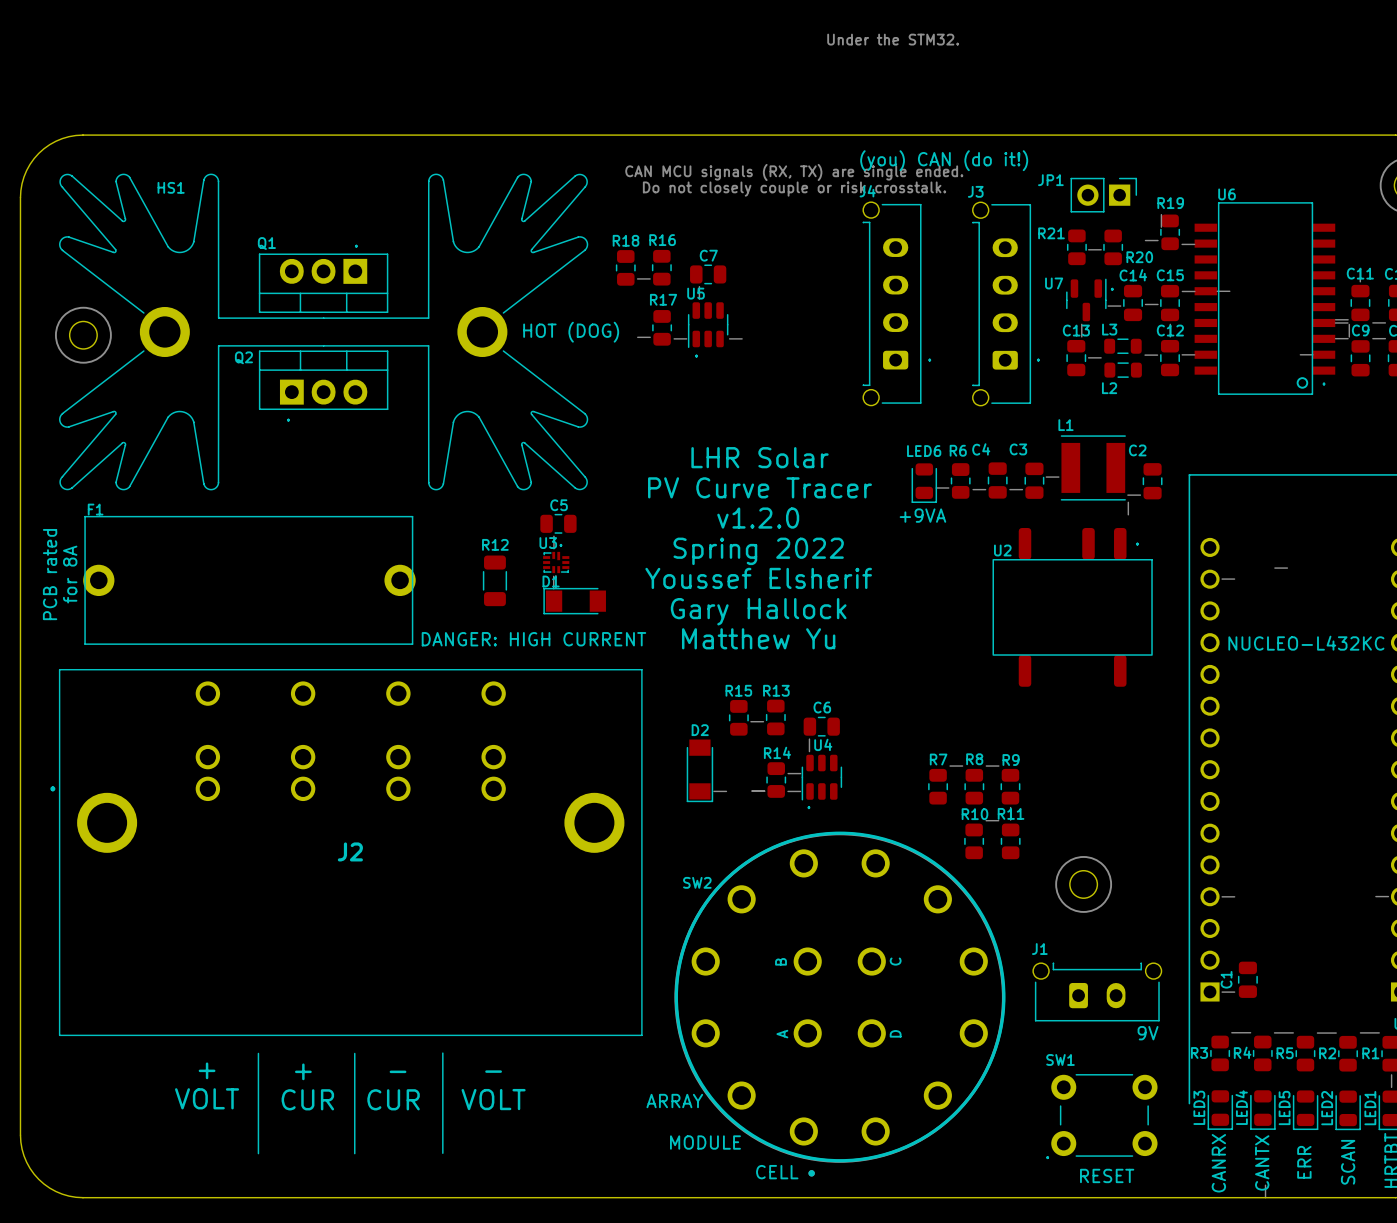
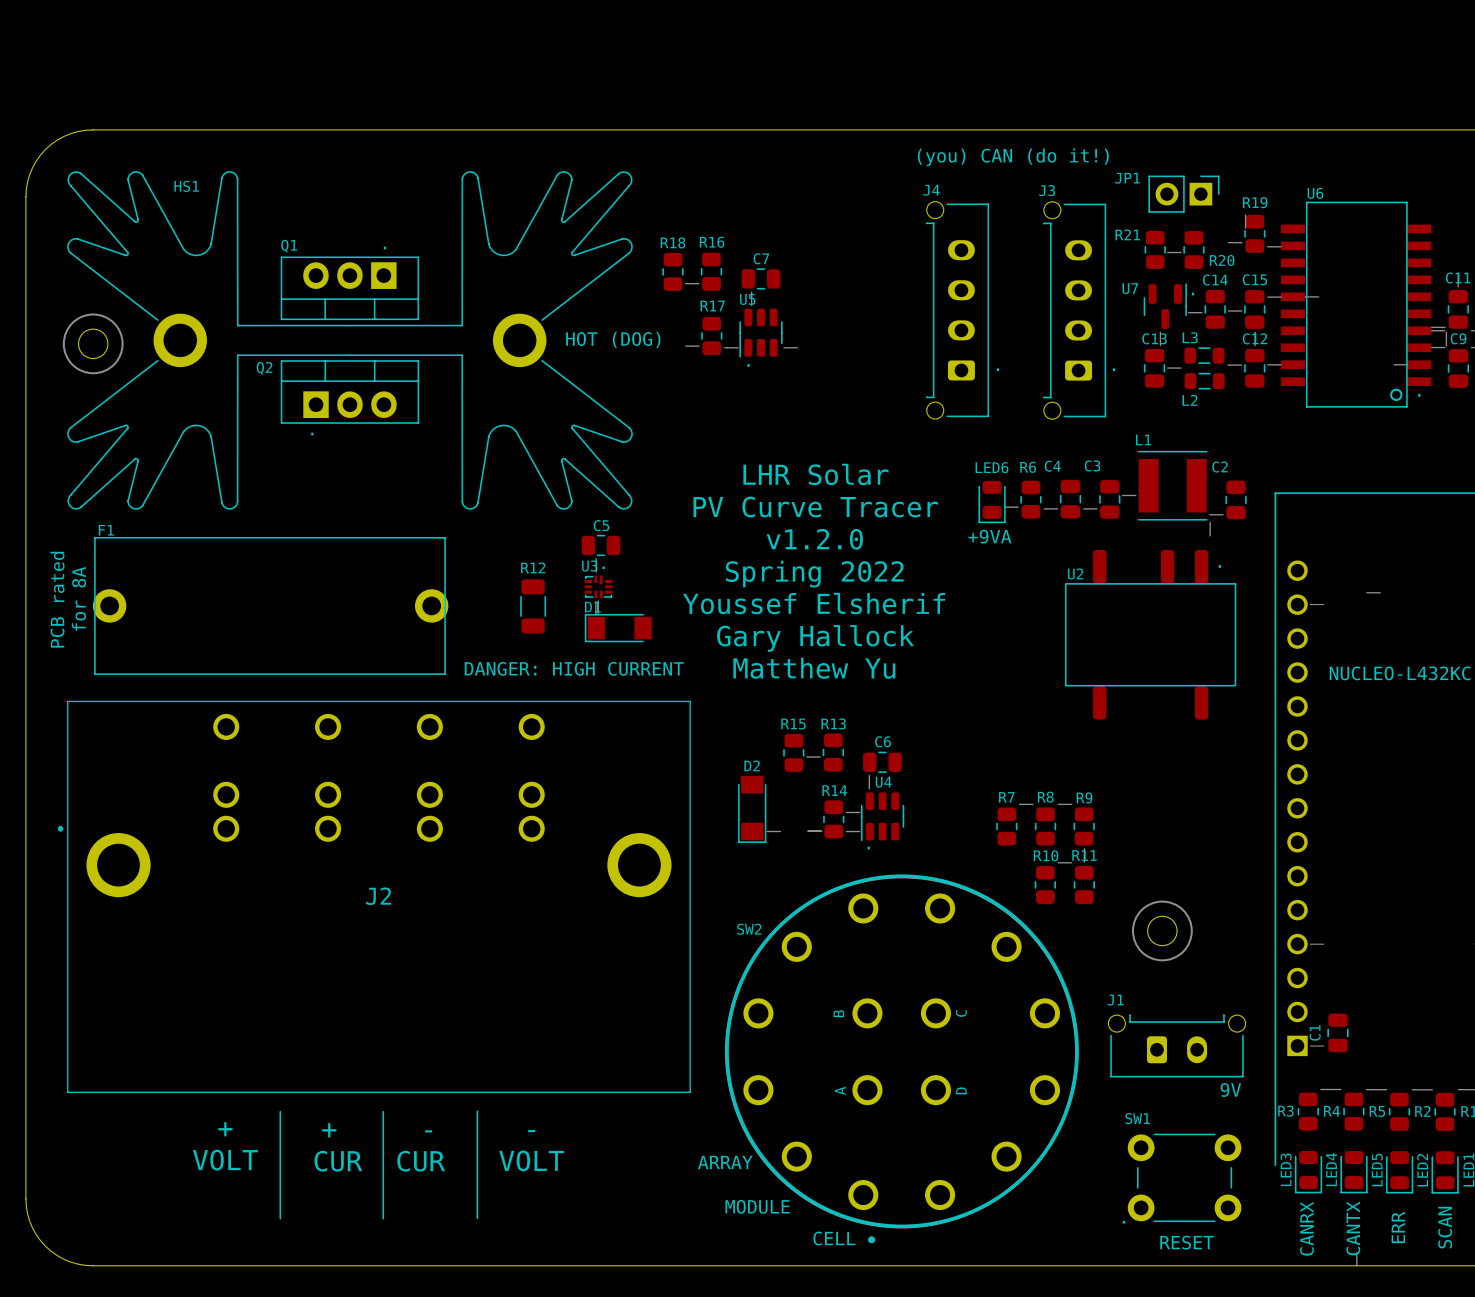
text: Under the STM32. (893, 39) -> none
text: CAN MCU signals (RX, TX) are single ended. (794, 172) -> none
text: Do not closely couple or risk crosstalk. (794, 189) -> none

